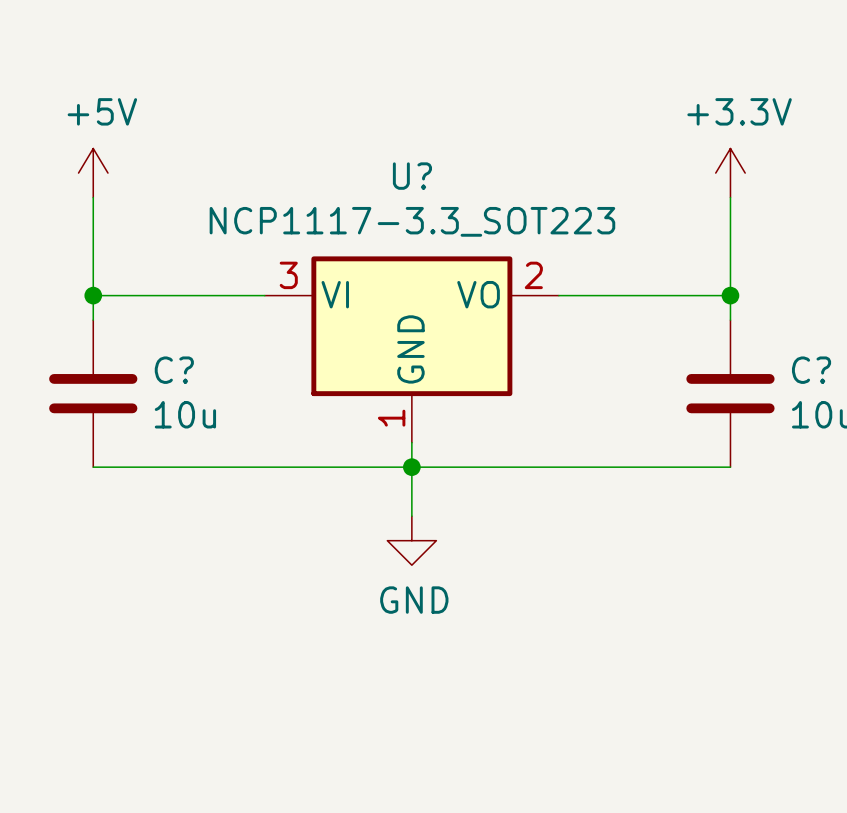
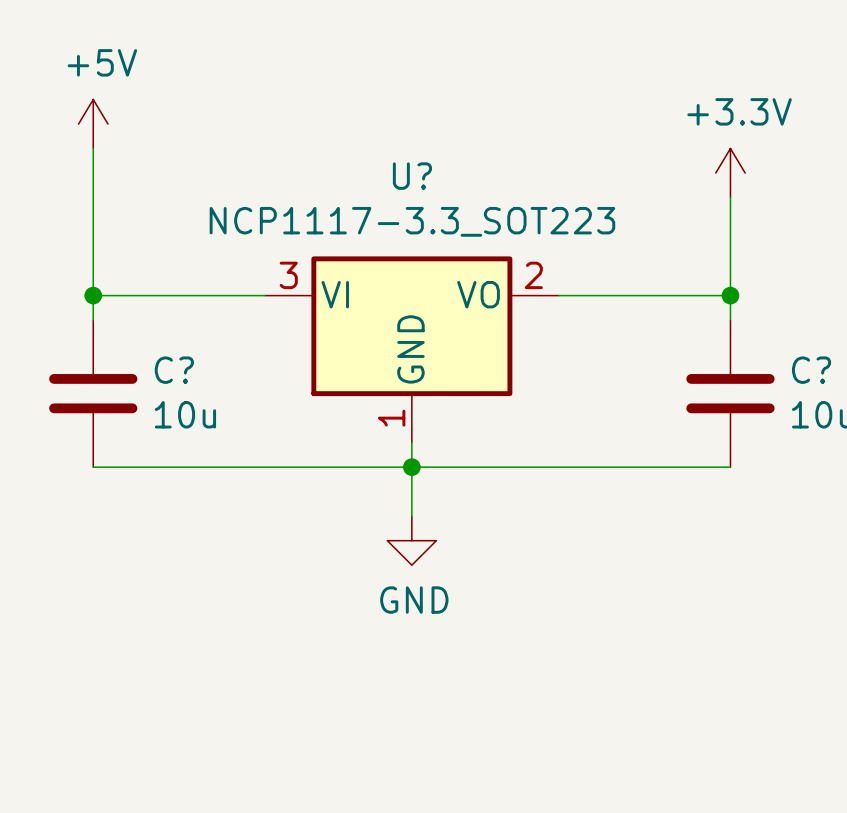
power symbol position: +5V (93, 173) -> +5V (93, 124)

